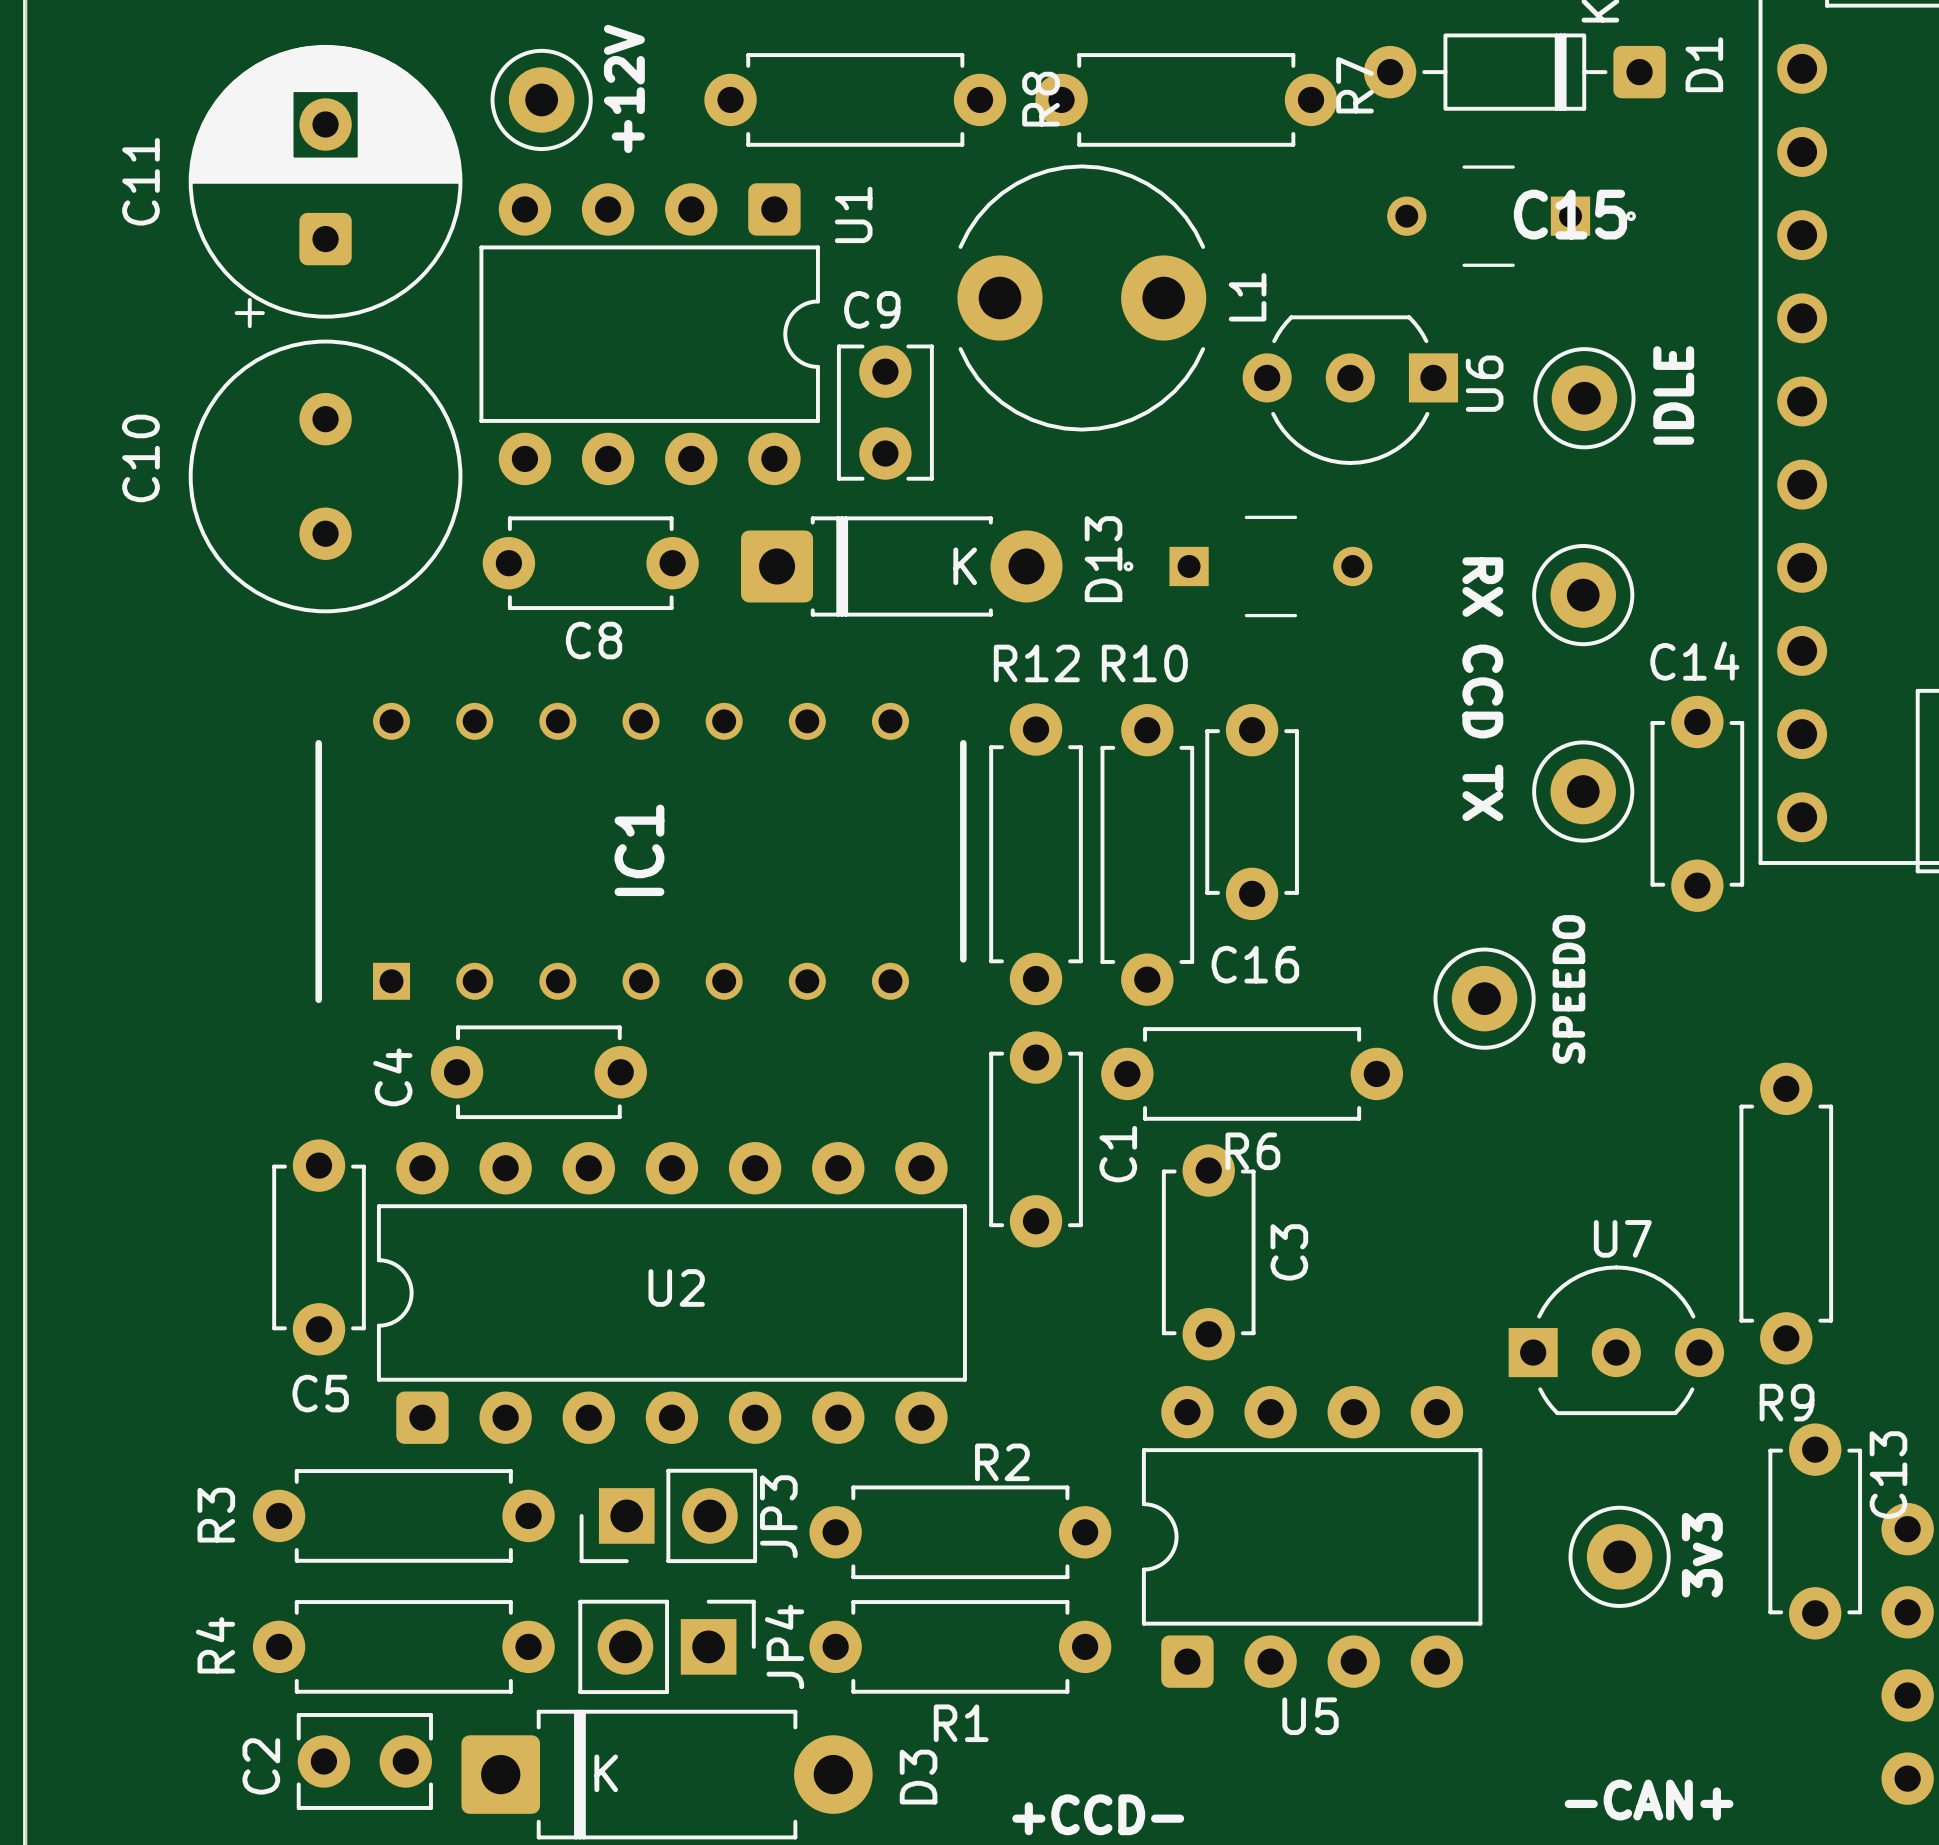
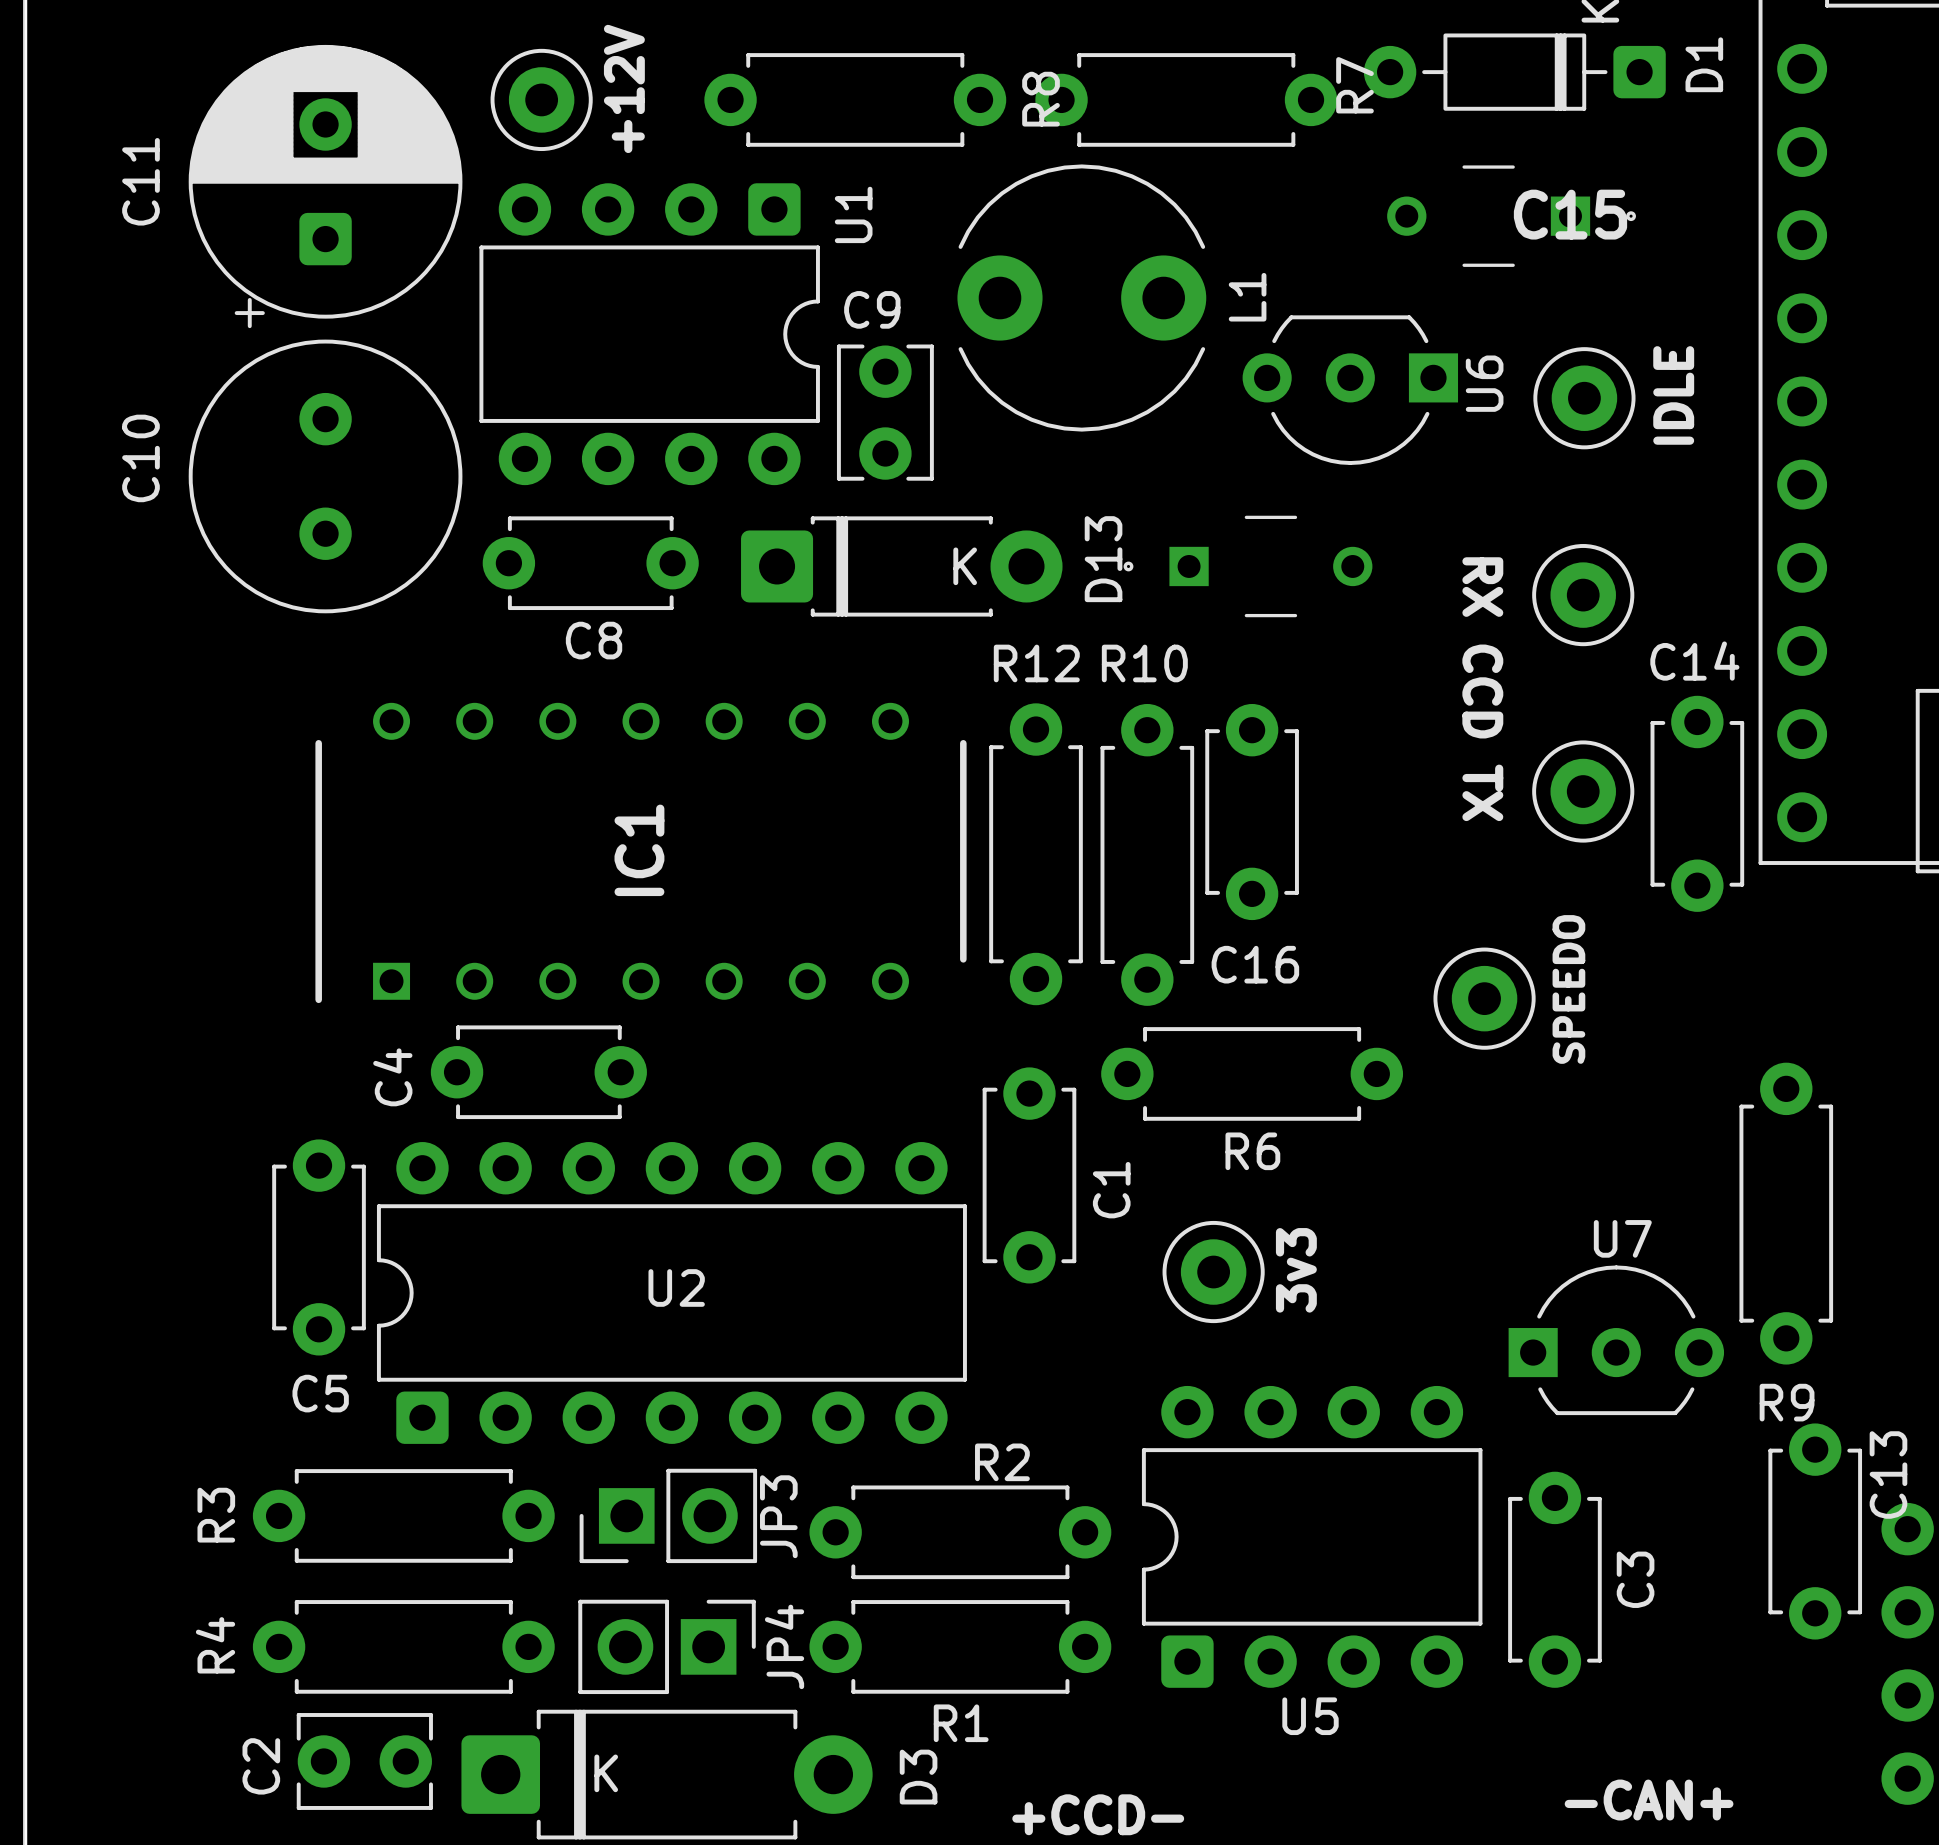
C1 position: (1036, 1139) -> (1029, 1175)
C3 position: (1208, 1252) -> (1554, 1579)
text position: 3v3 (1702, 1555) -> 3v3 (1296, 1270)
part position: (1619, 1556) -> (1213, 1272)

